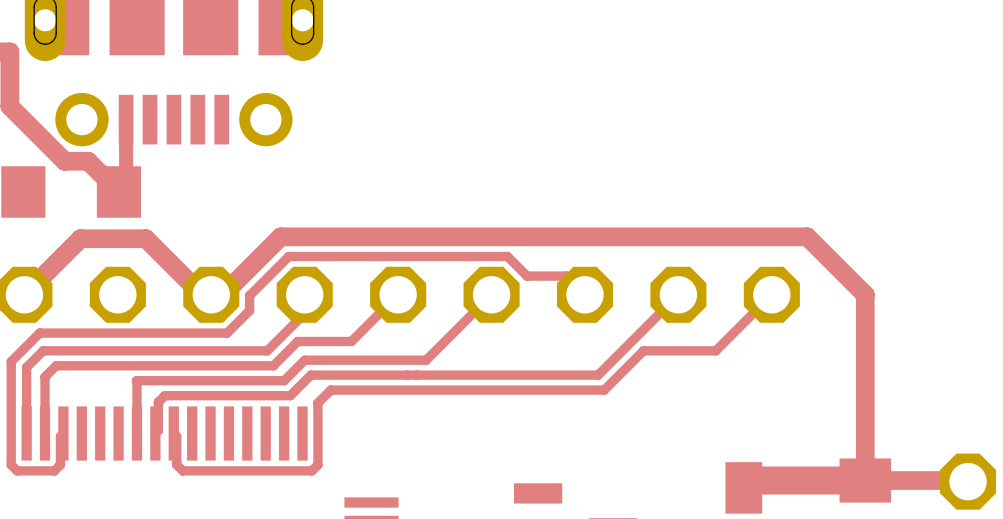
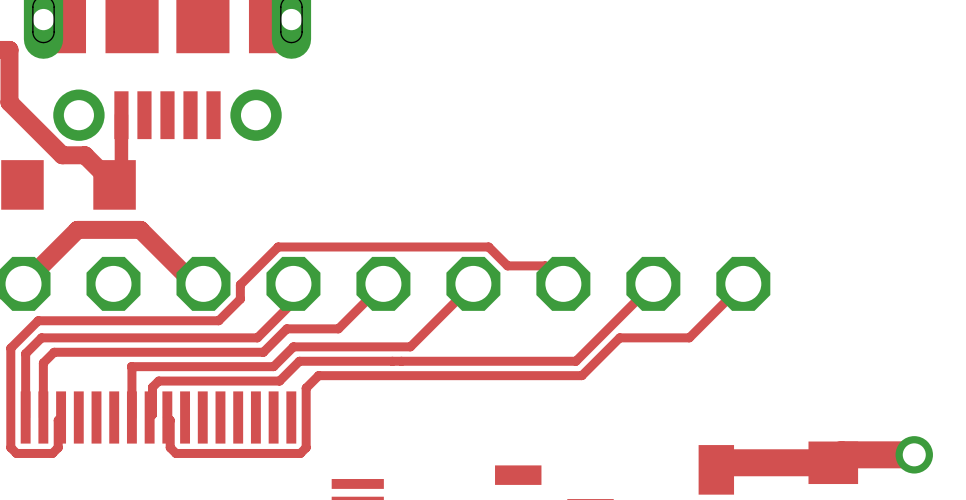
top track: (211, 294) (222, 294) (280, 236) (807, 236) (865, 294) (865, 480) (968, 481) -> none
top track: none -> (914, 454) (841, 454)
via: none -> (914, 454)
part: (968, 481) -> none

